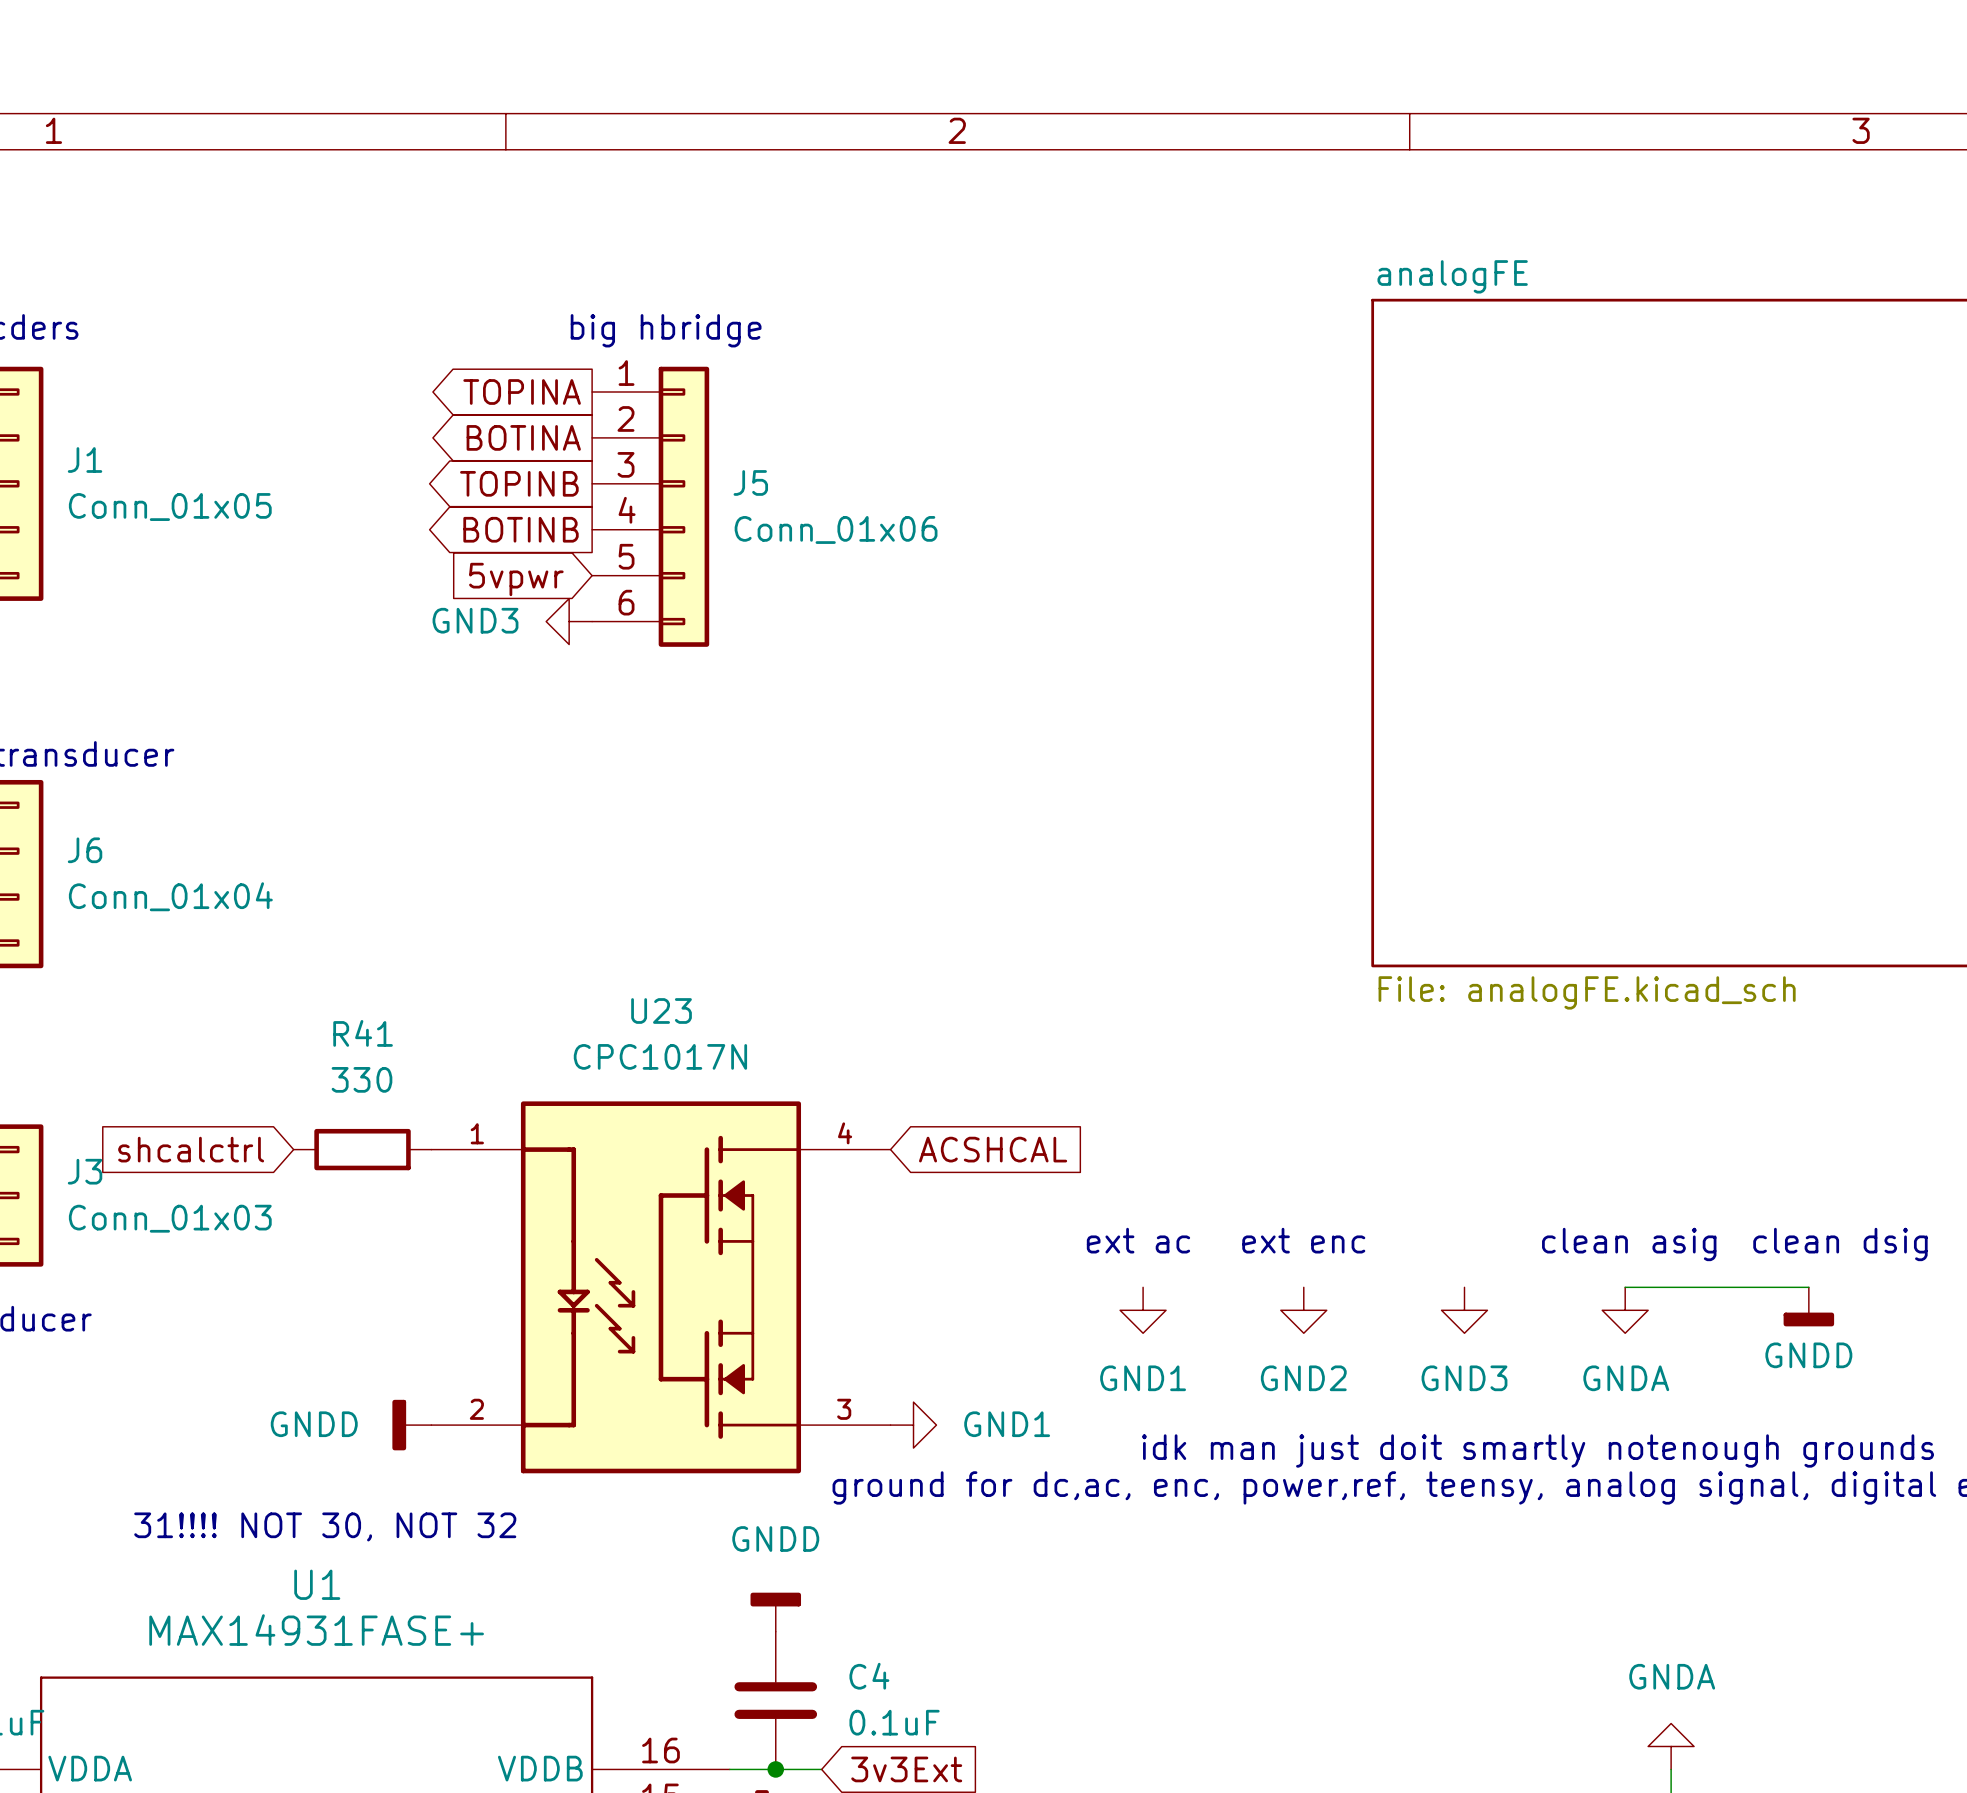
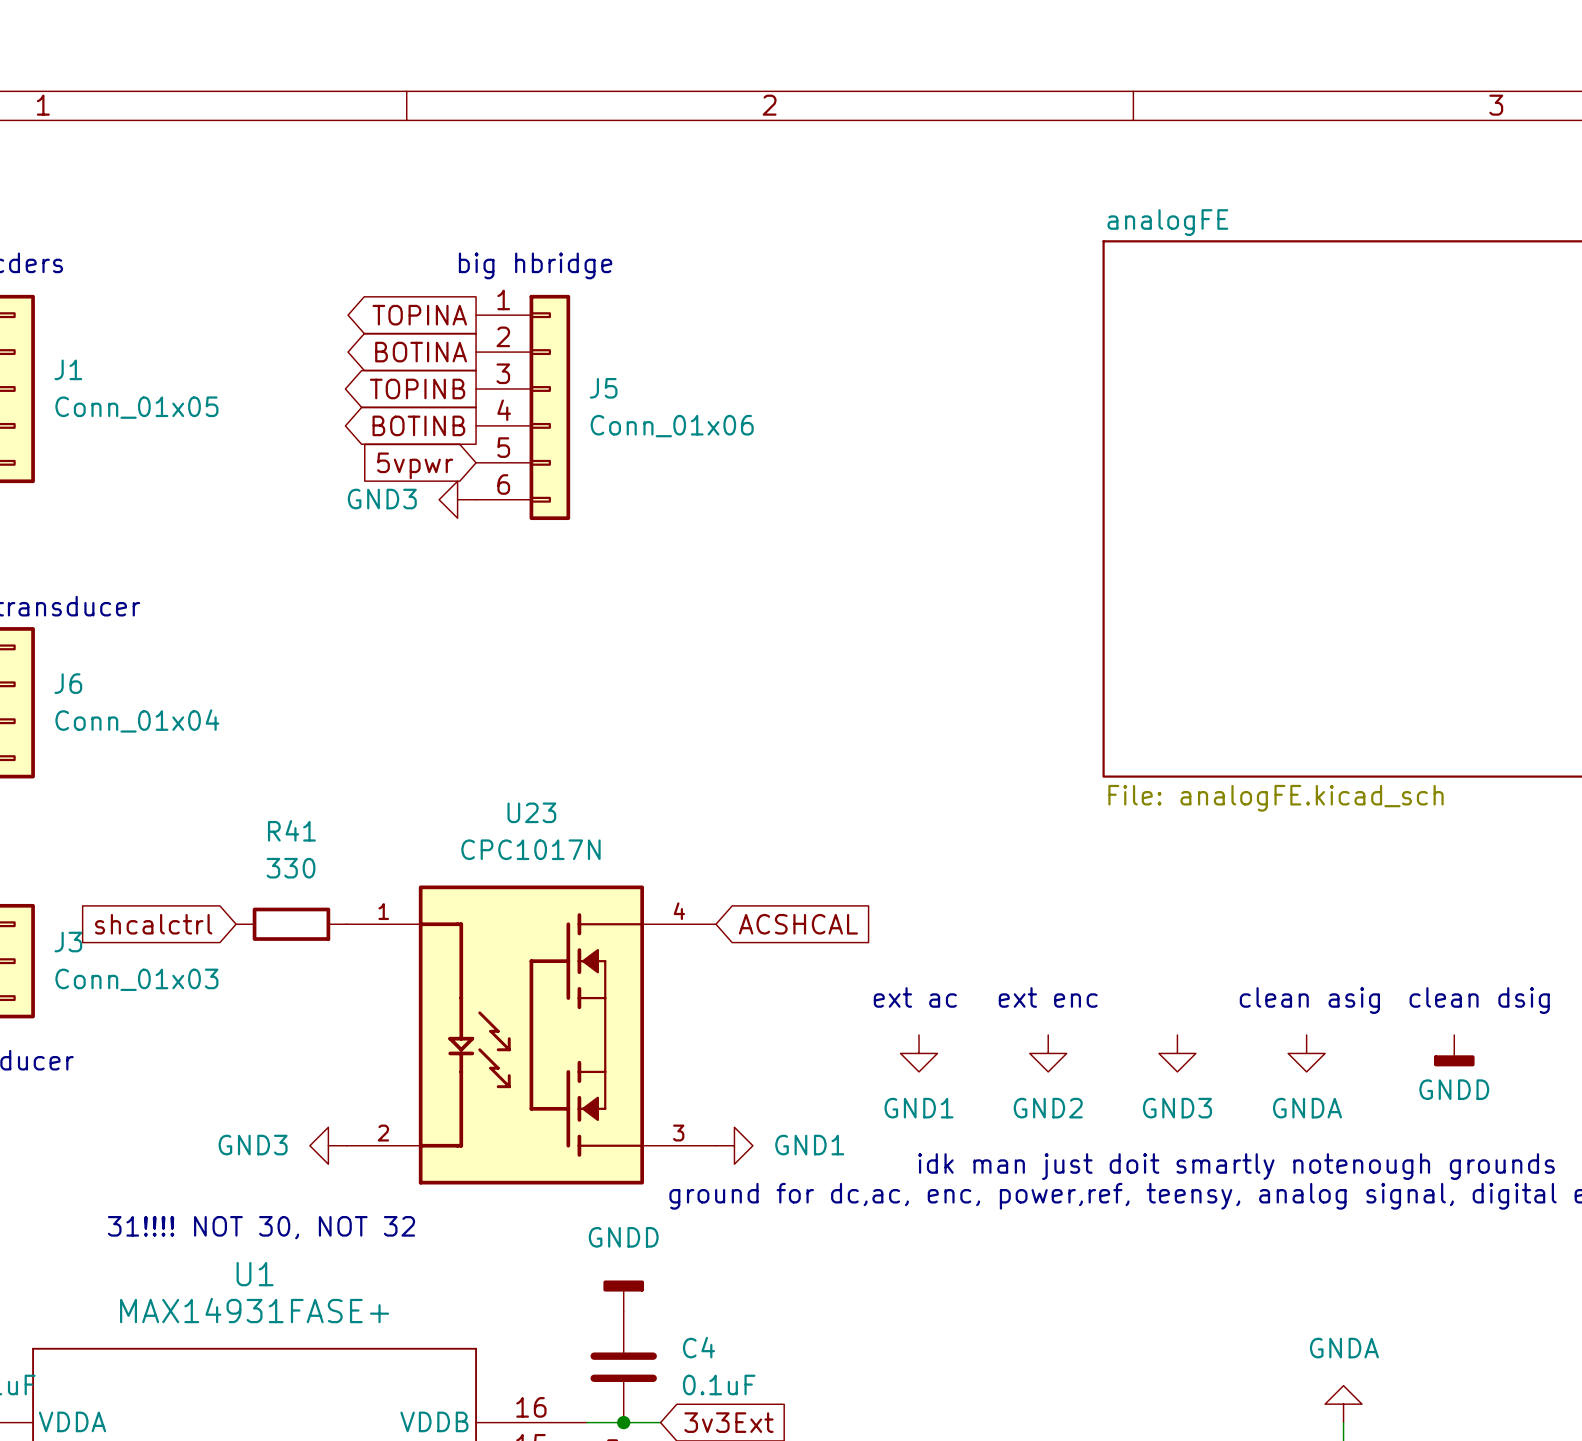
wire: (1625, 1287) (1808, 1287) -> none
power symbol: GNDD (411, 1425) -> GND3 (328, 1145)

